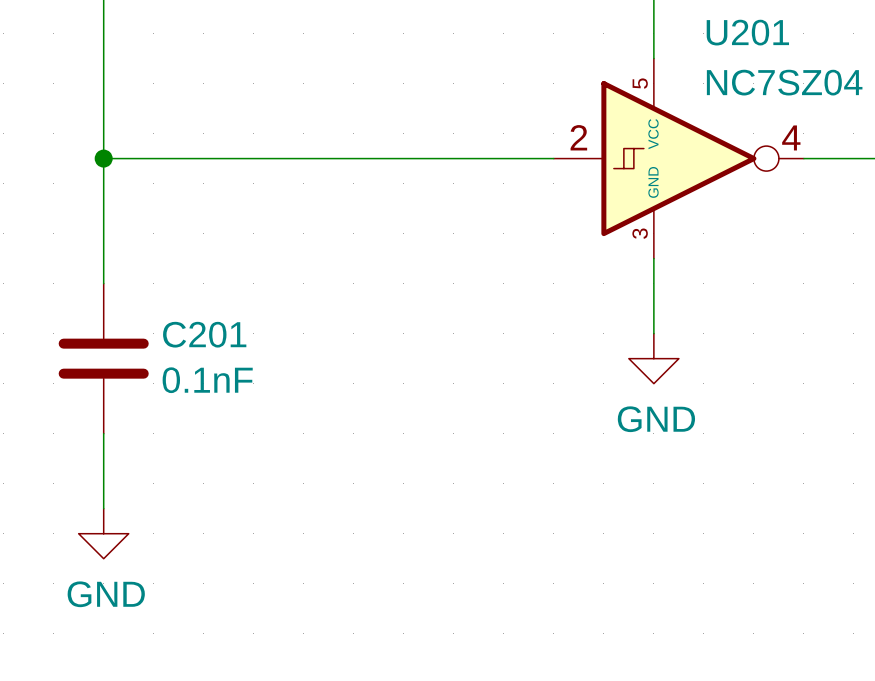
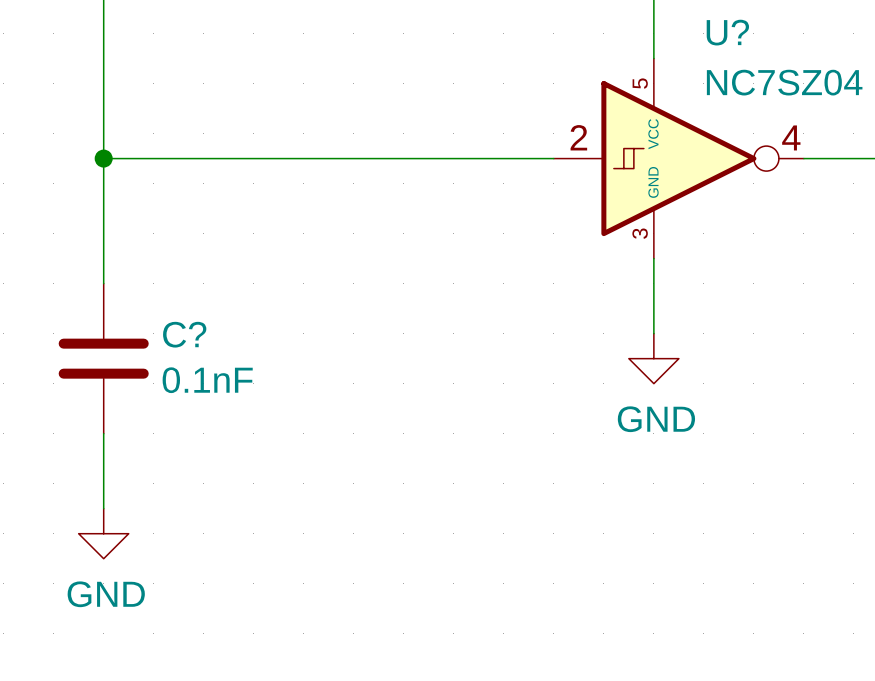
U201 name: U201 (747, 32) -> U? (727, 32)
C201 name: C201 (204, 334) -> C? (184, 334)

